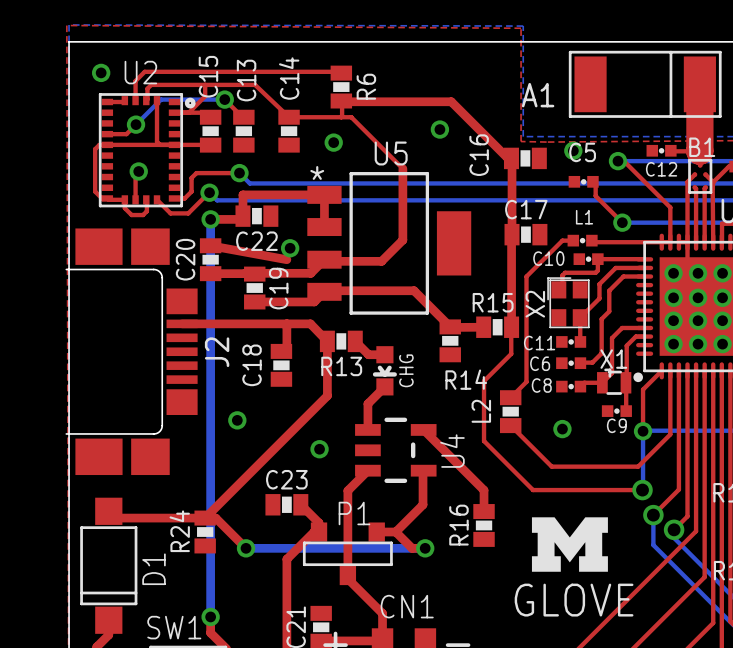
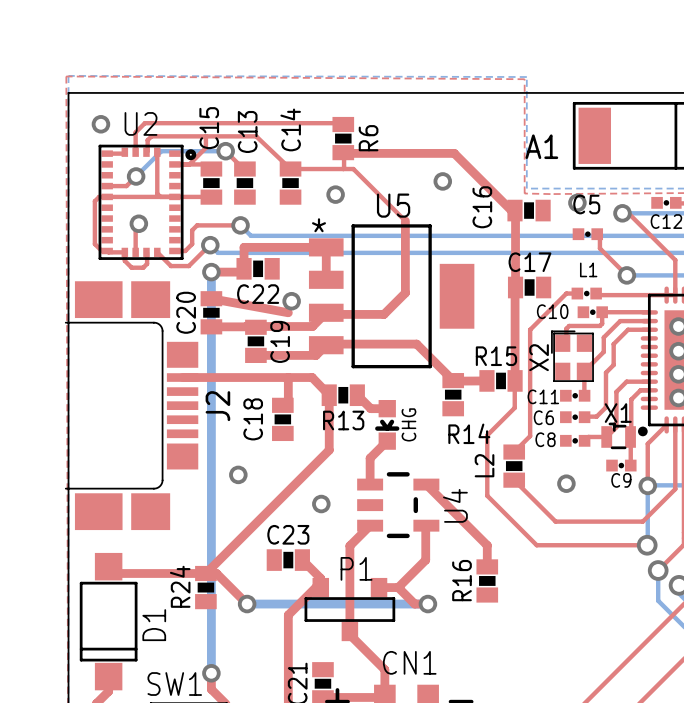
drawing: [531, 517, 608, 572] -> none
text: GLOVE (574, 600) -> none

